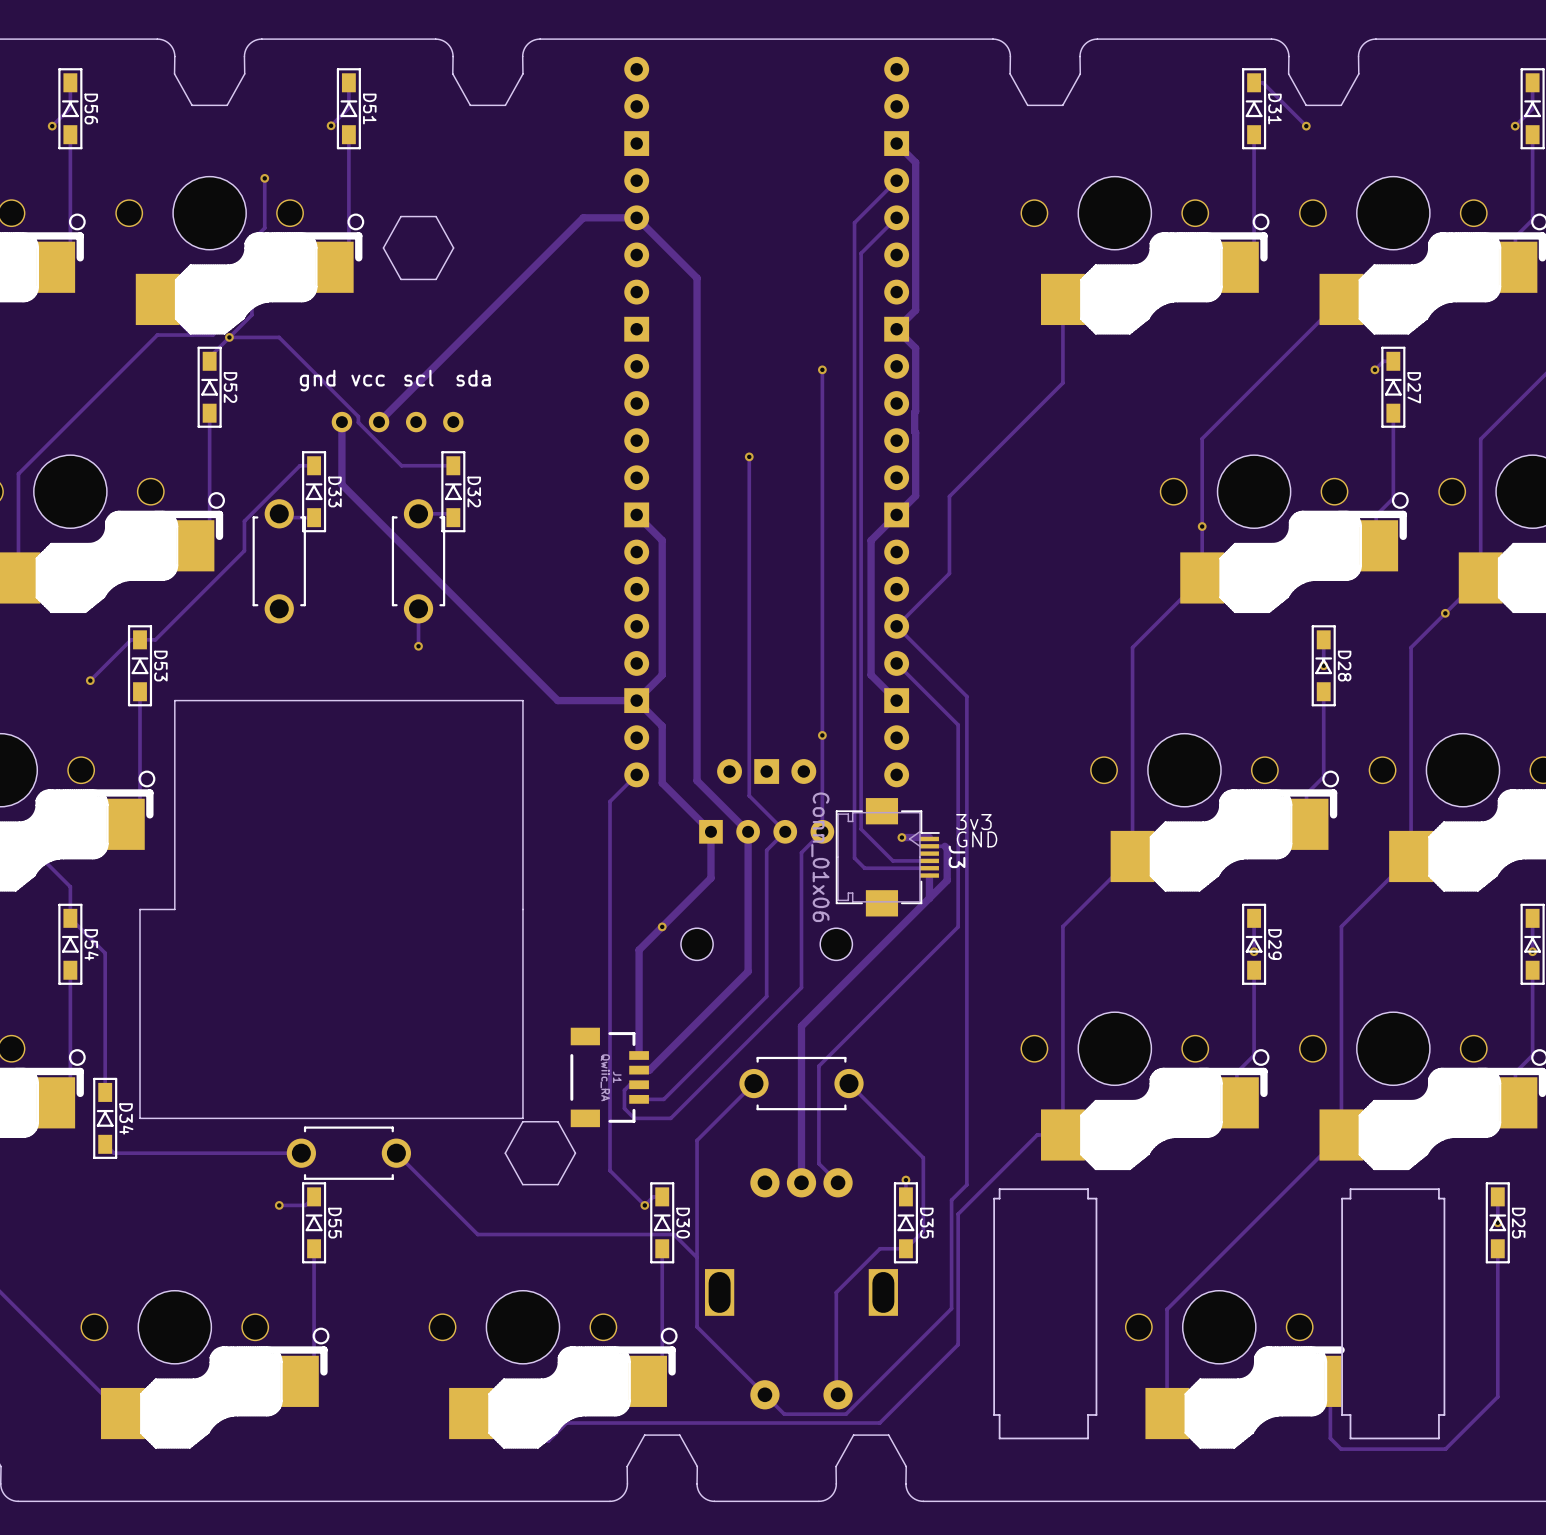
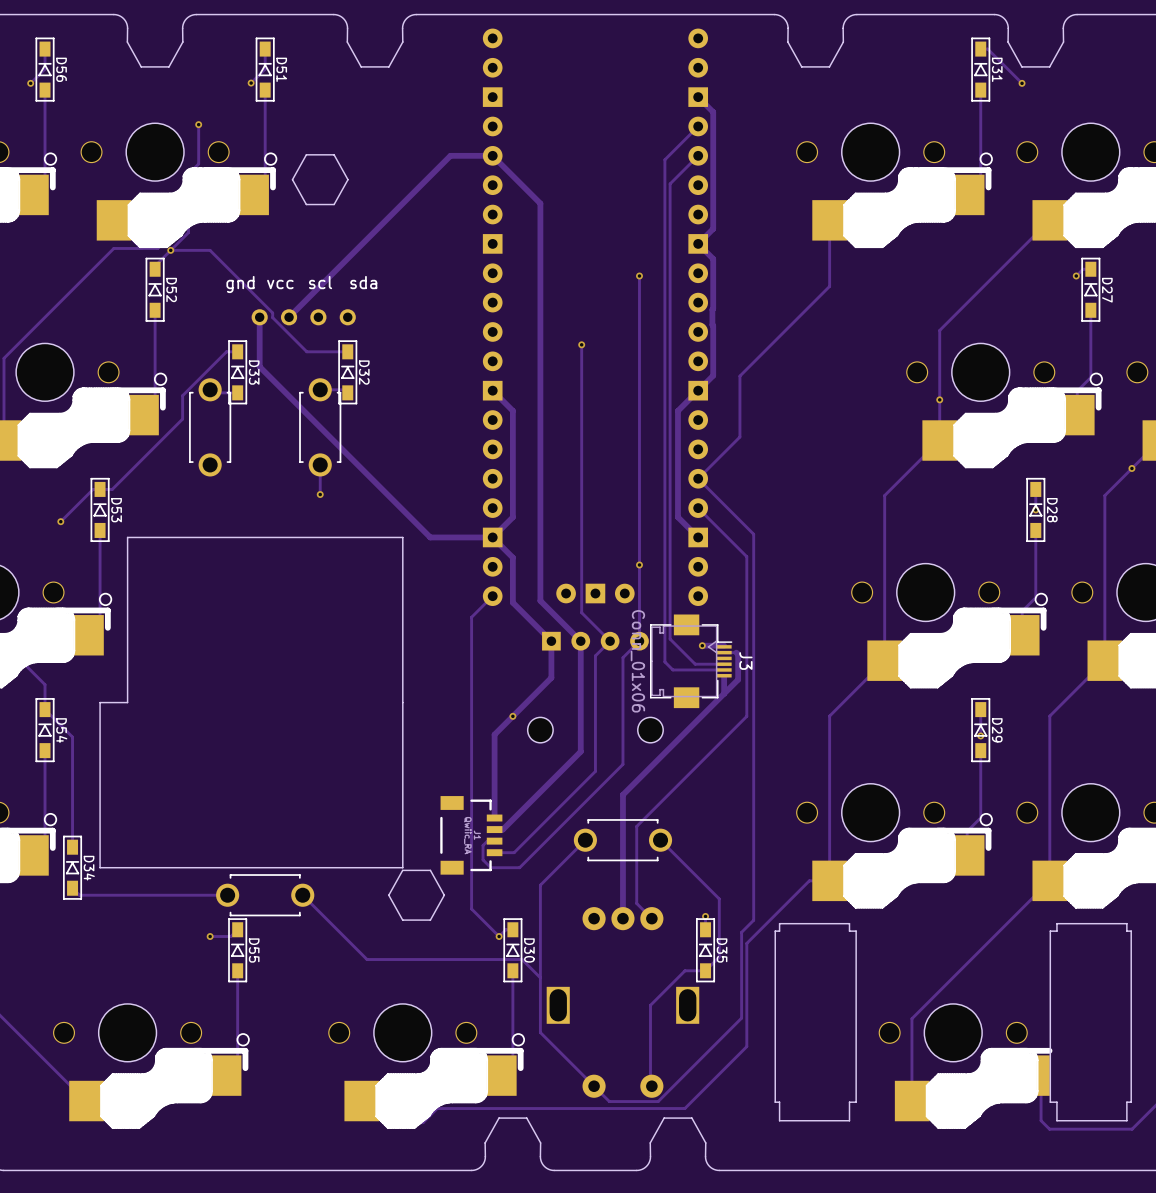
text: 3v3 (973, 822) -> none
text: GND (977, 839) -> none

